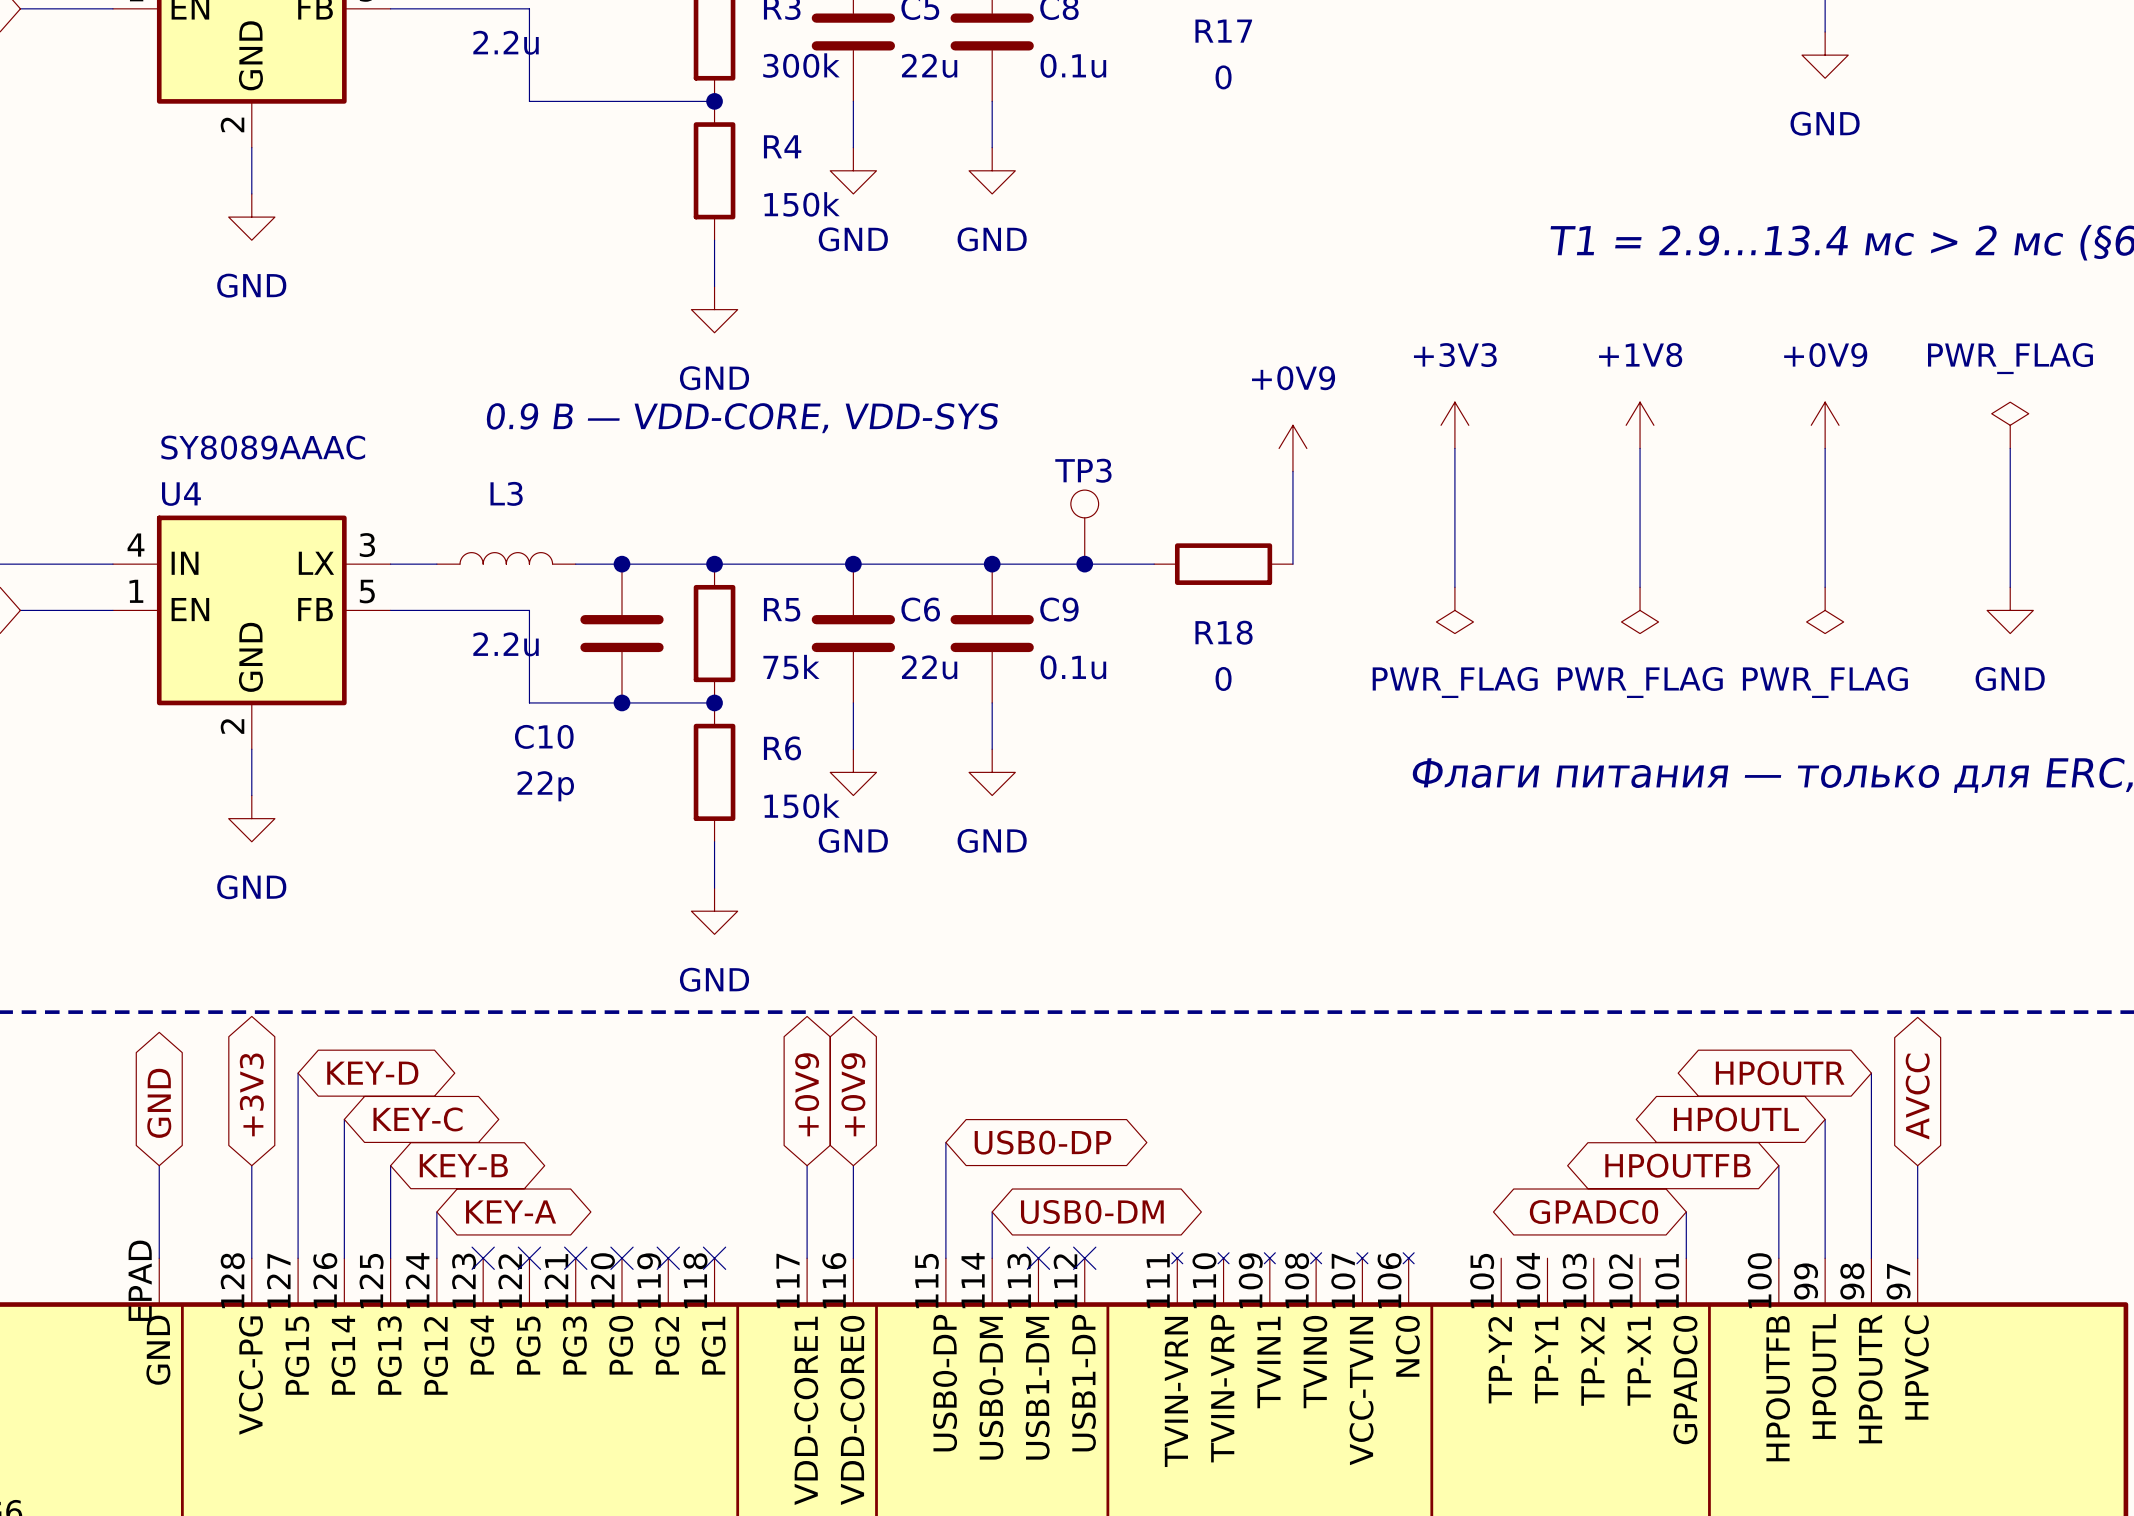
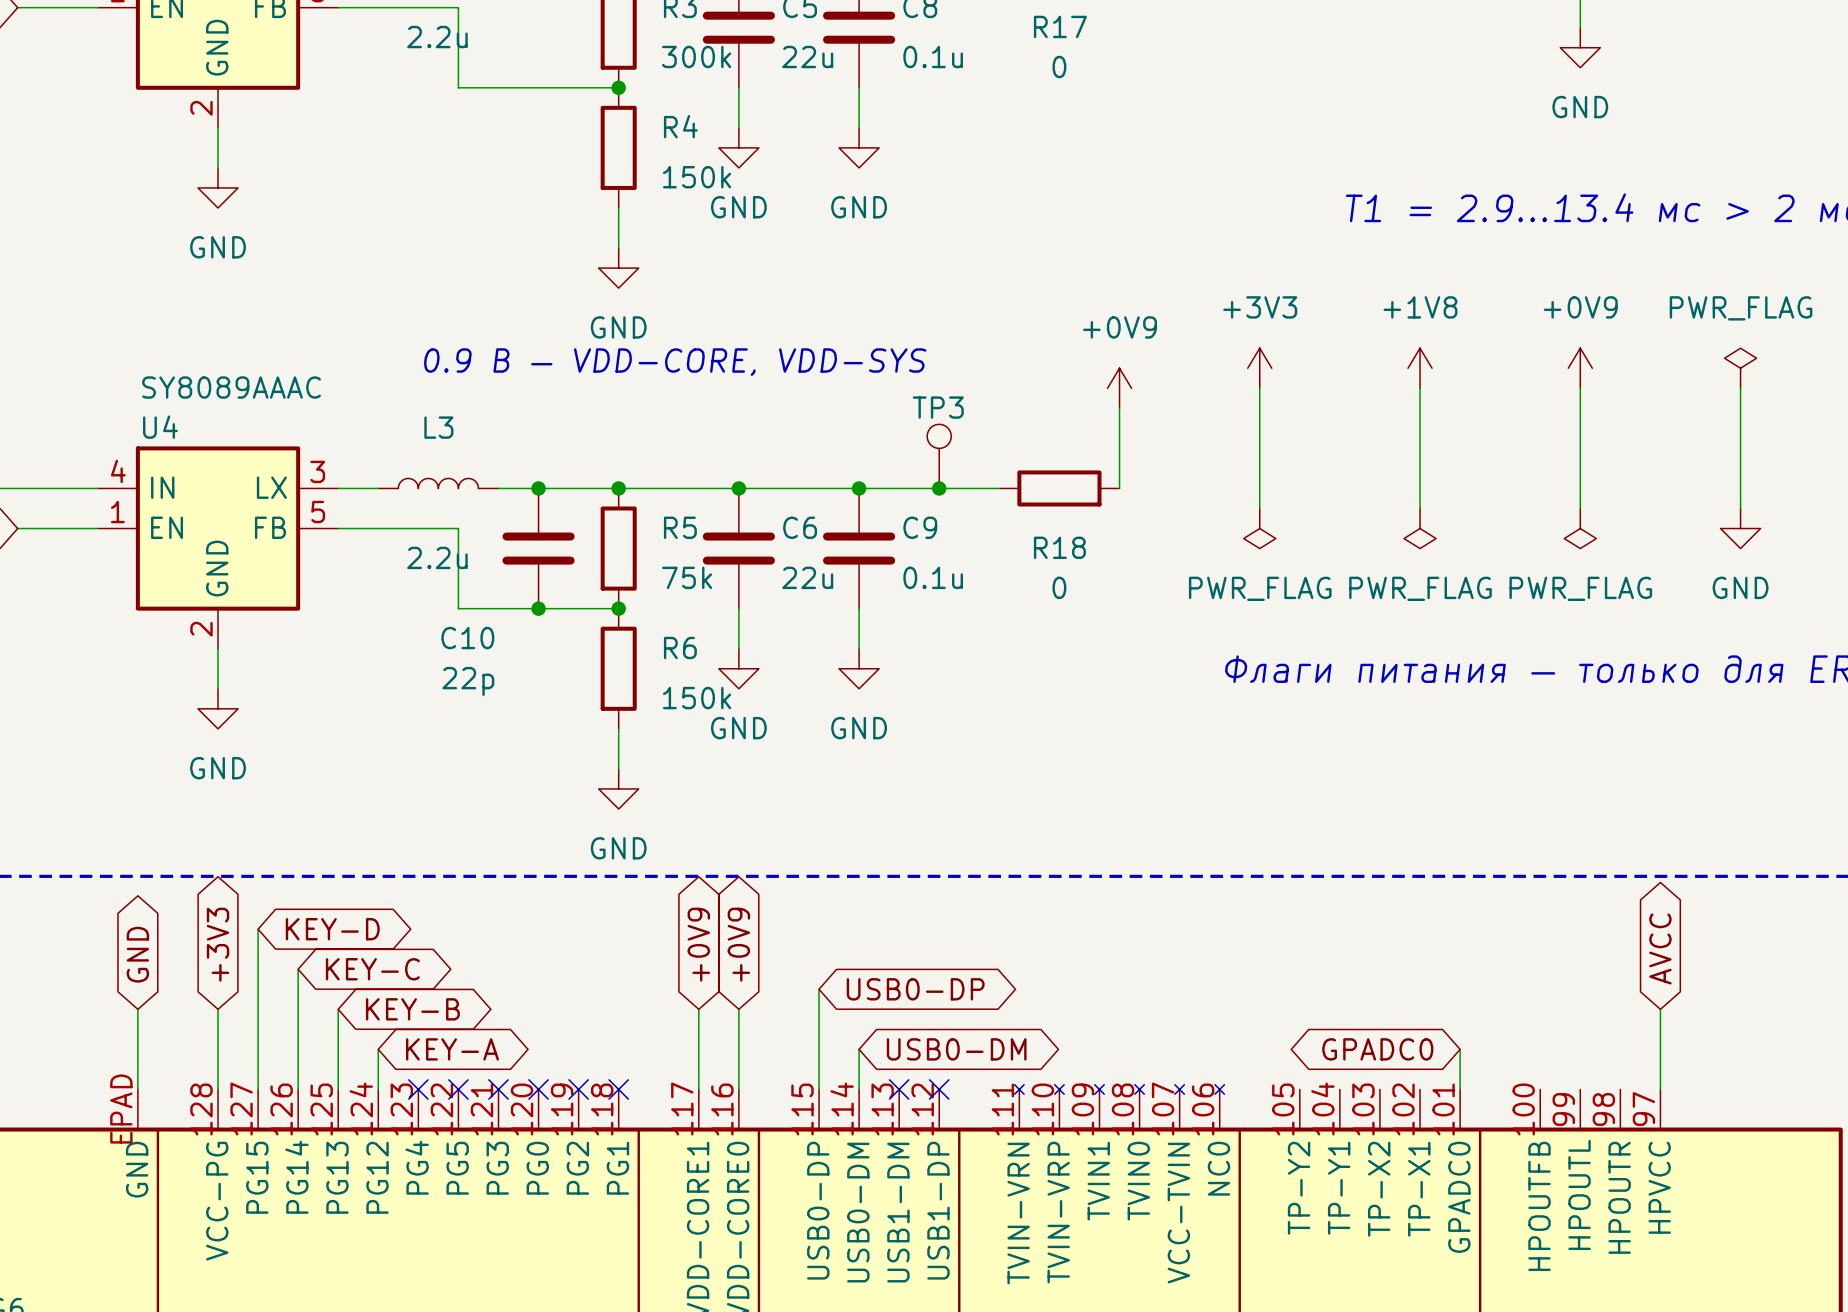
global label: HPOUTR (1780, 1073) -> none
wire: (1871, 1073) (1871, 1258) -> none
global label: HPOUTL (1736, 1119) -> none
wire: (1825, 1119) (1825, 1258) -> none
global label: HPOUTFB (1677, 1165) -> none
wire: (1778, 1165) (1778, 1258) -> none

